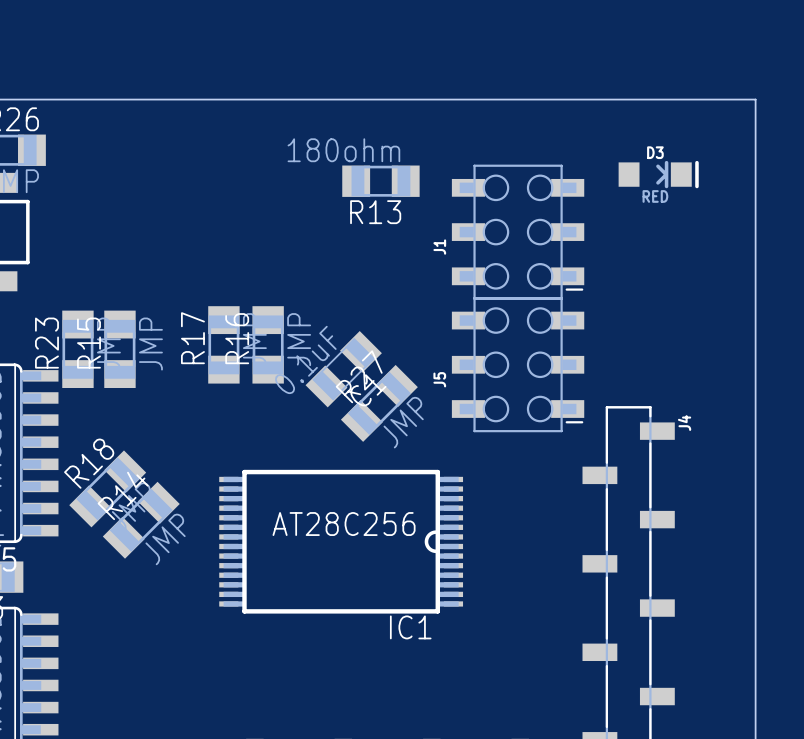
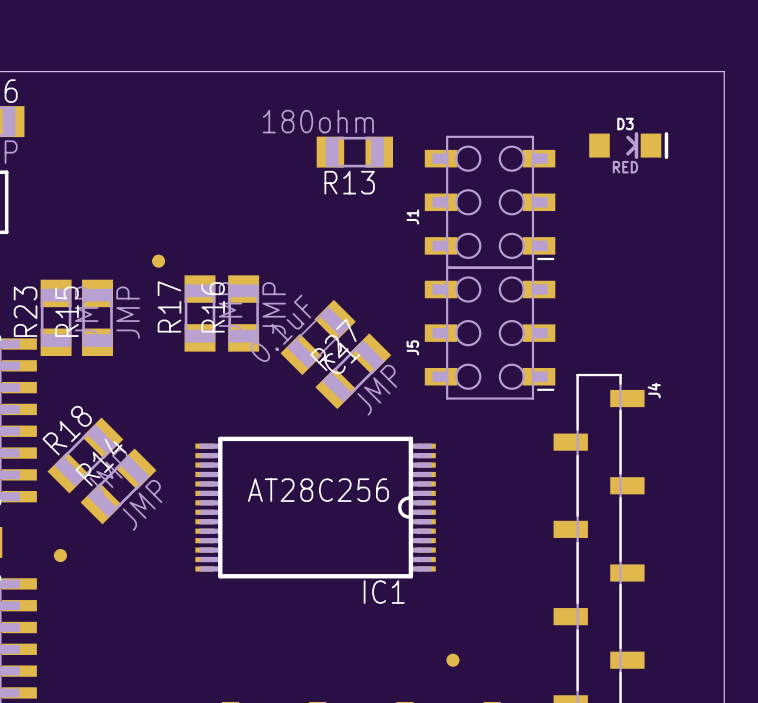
part: none -> (158, 261)
part: none -> (60, 555)
part: none -> (452, 660)

